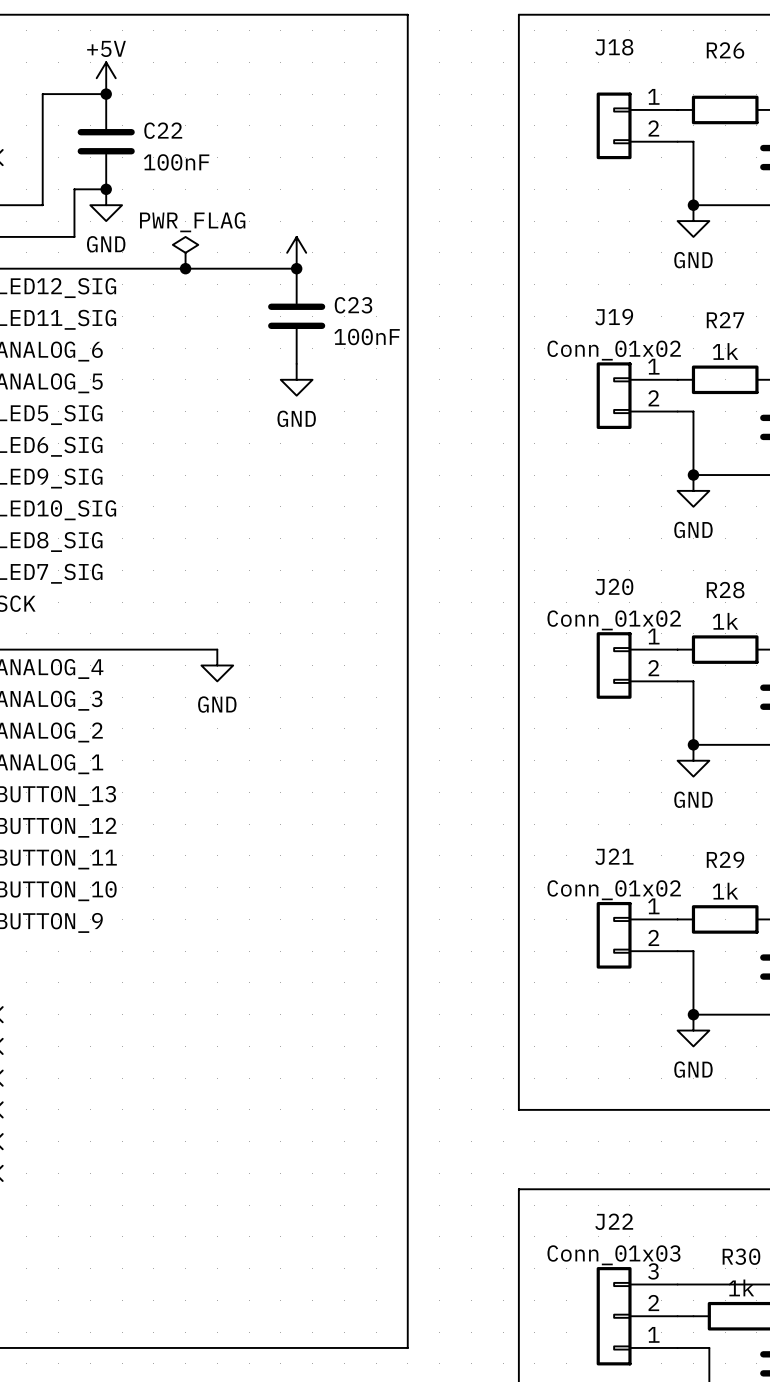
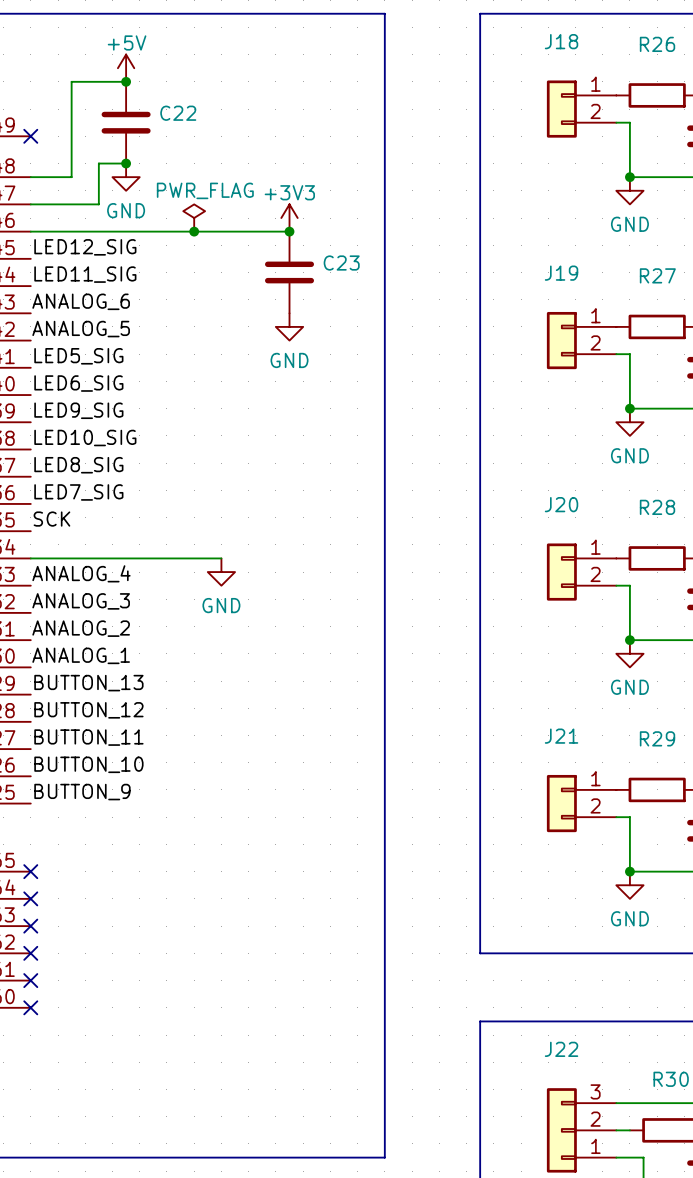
C22 value: 100nF (176, 162) -> none
power symbol text: none -> +3V3 (289, 192)
C23 value: 100nF (367, 336) -> none
J19 value: Conn_01x02 (614, 350) -> none
R27 value: 1k (725, 351) -> none
J20 value: Conn_01x02 (614, 620) -> none
R28 value: 1k (725, 621) -> none
J21 value: Conn_01x02 (614, 890) -> none
R29 value: 1k (725, 891) -> none
J22 value: Conn_01x03 (613, 1255) -> none
R30 value: 1k (741, 1287) -> none

